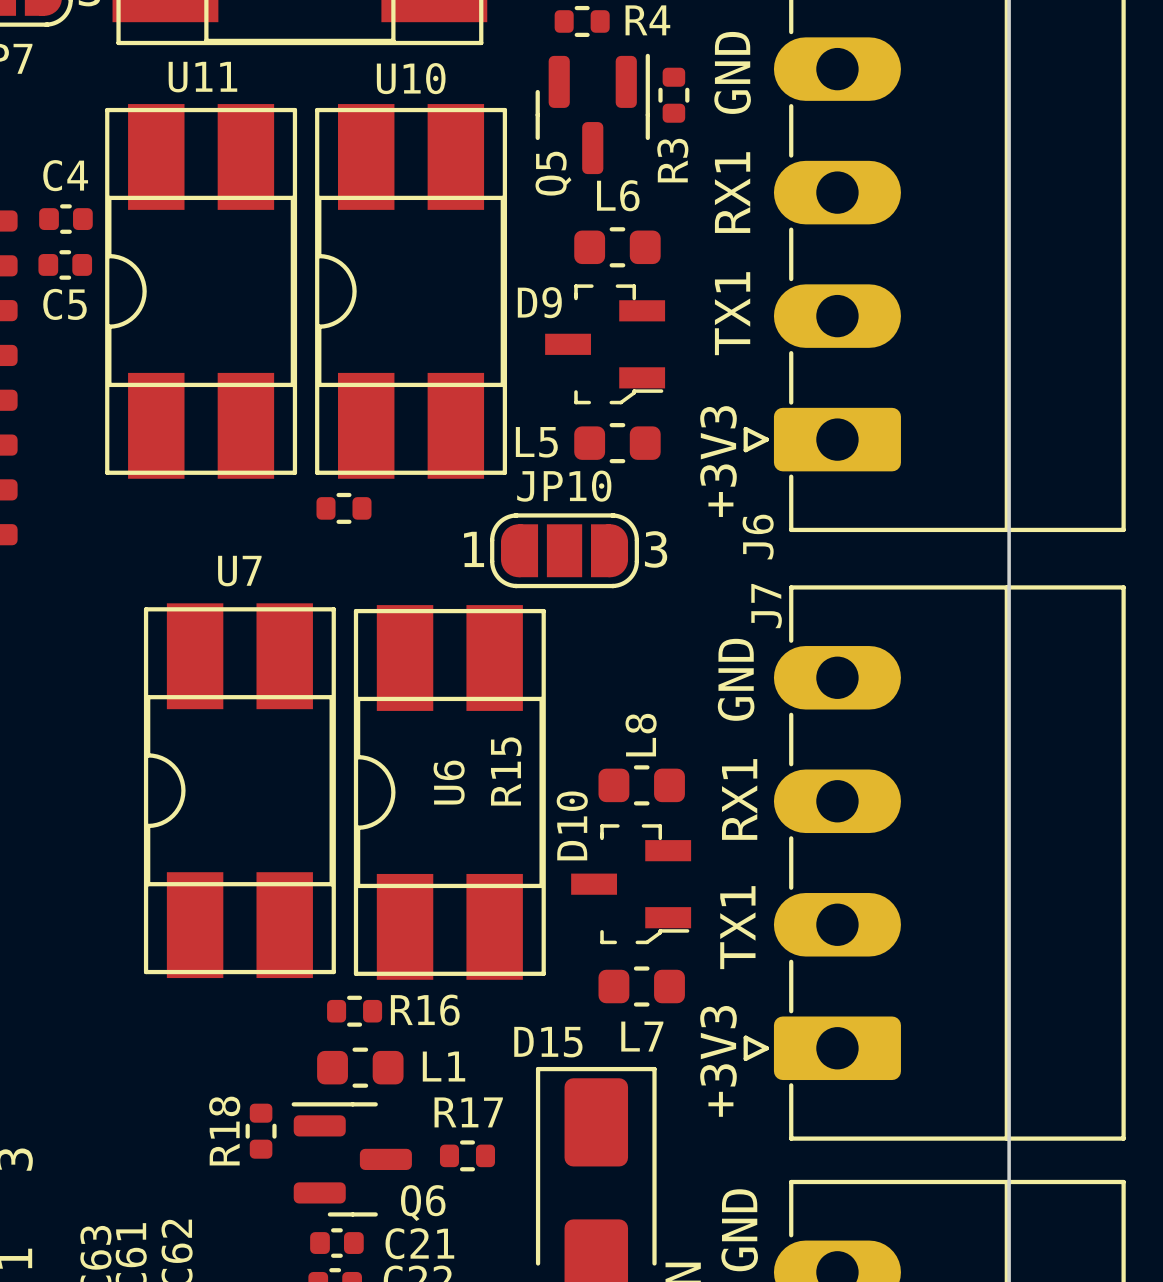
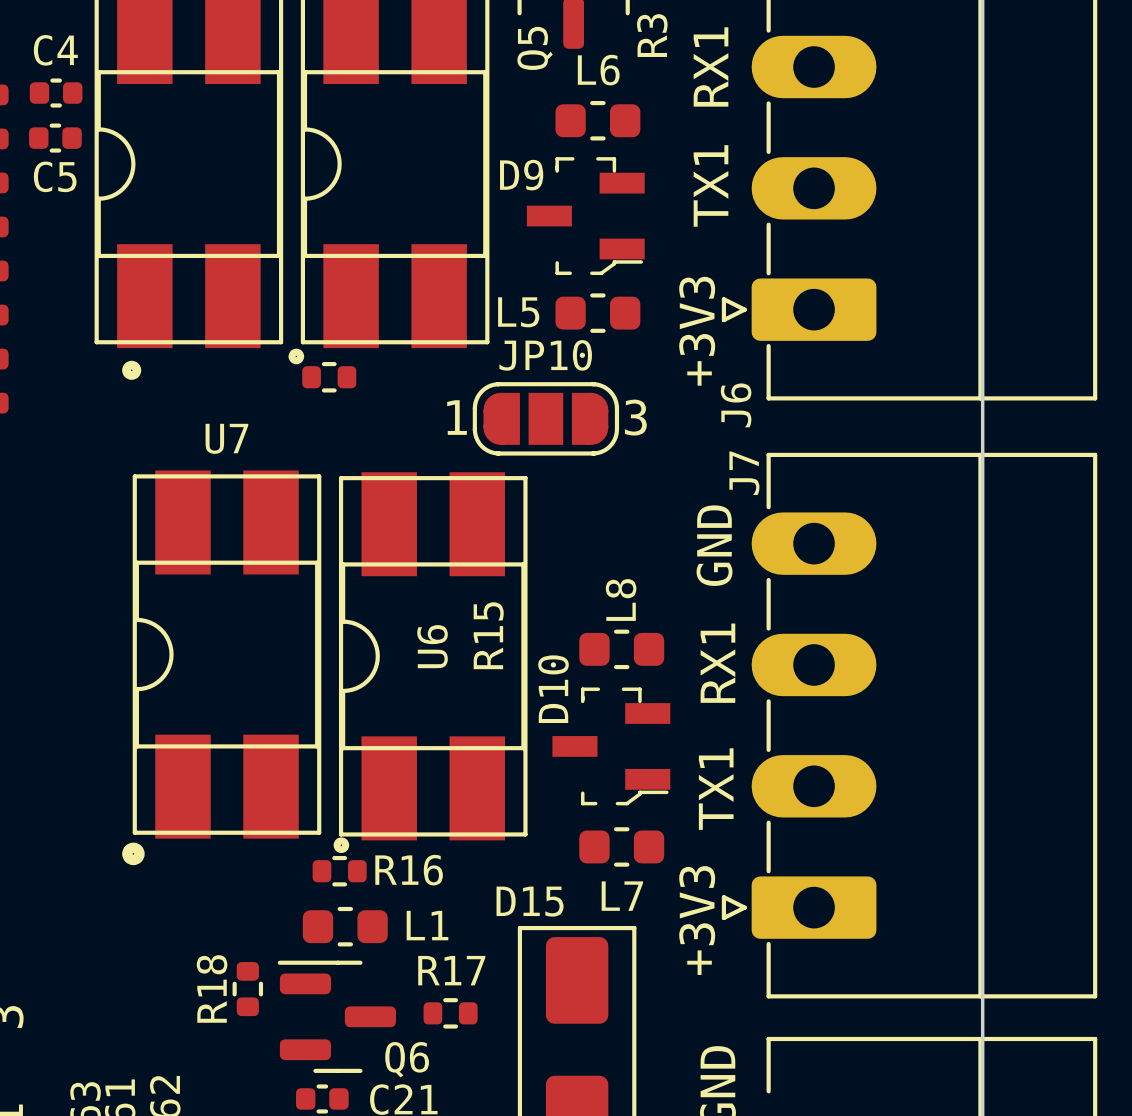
drawing: none -> [288, 348, 305, 365]
drawing: none -> [122, 360, 142, 380]
drawing: none -> [333, 837, 350, 854]
drawing: none -> [122, 842, 145, 866]

